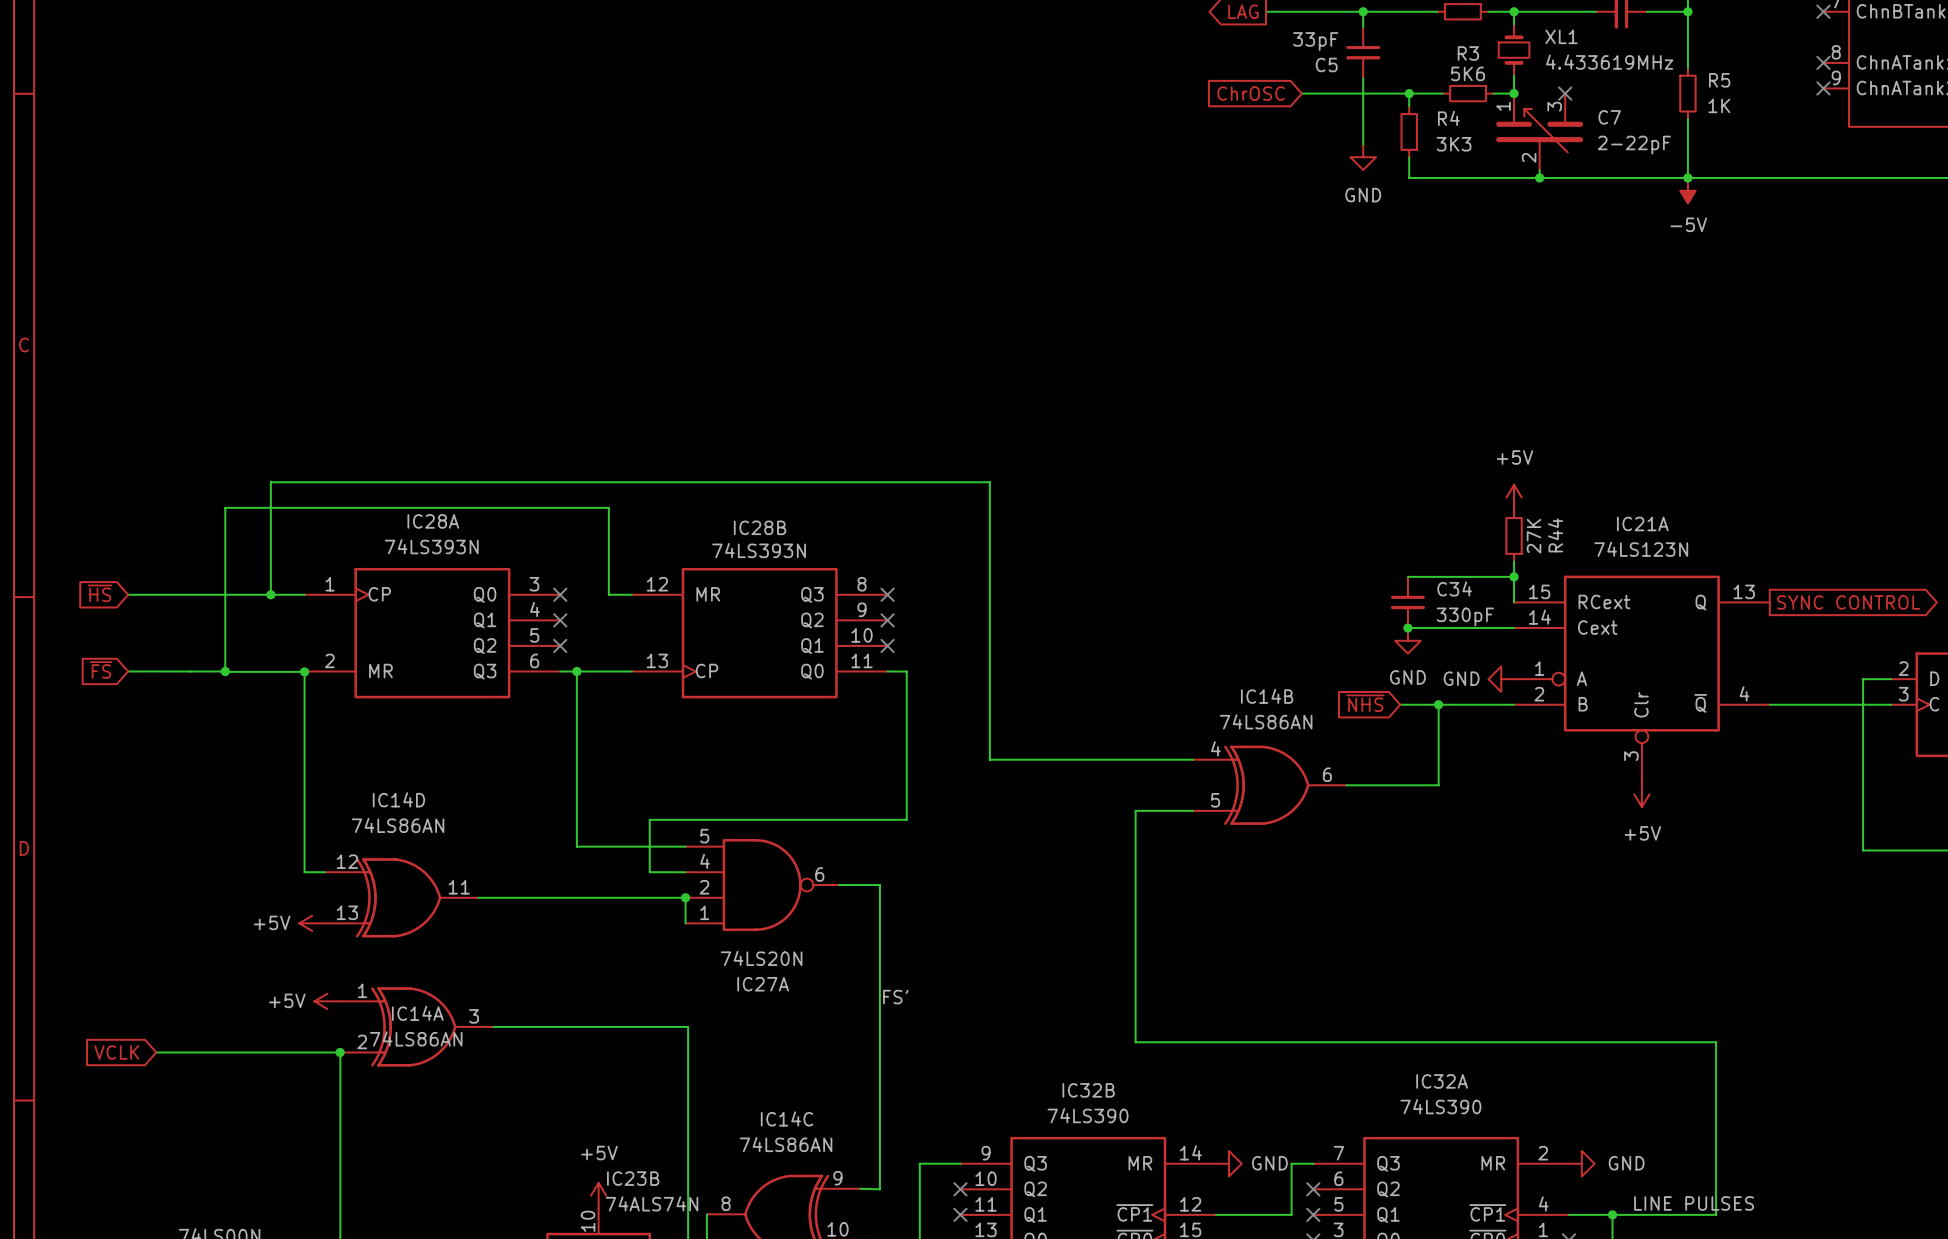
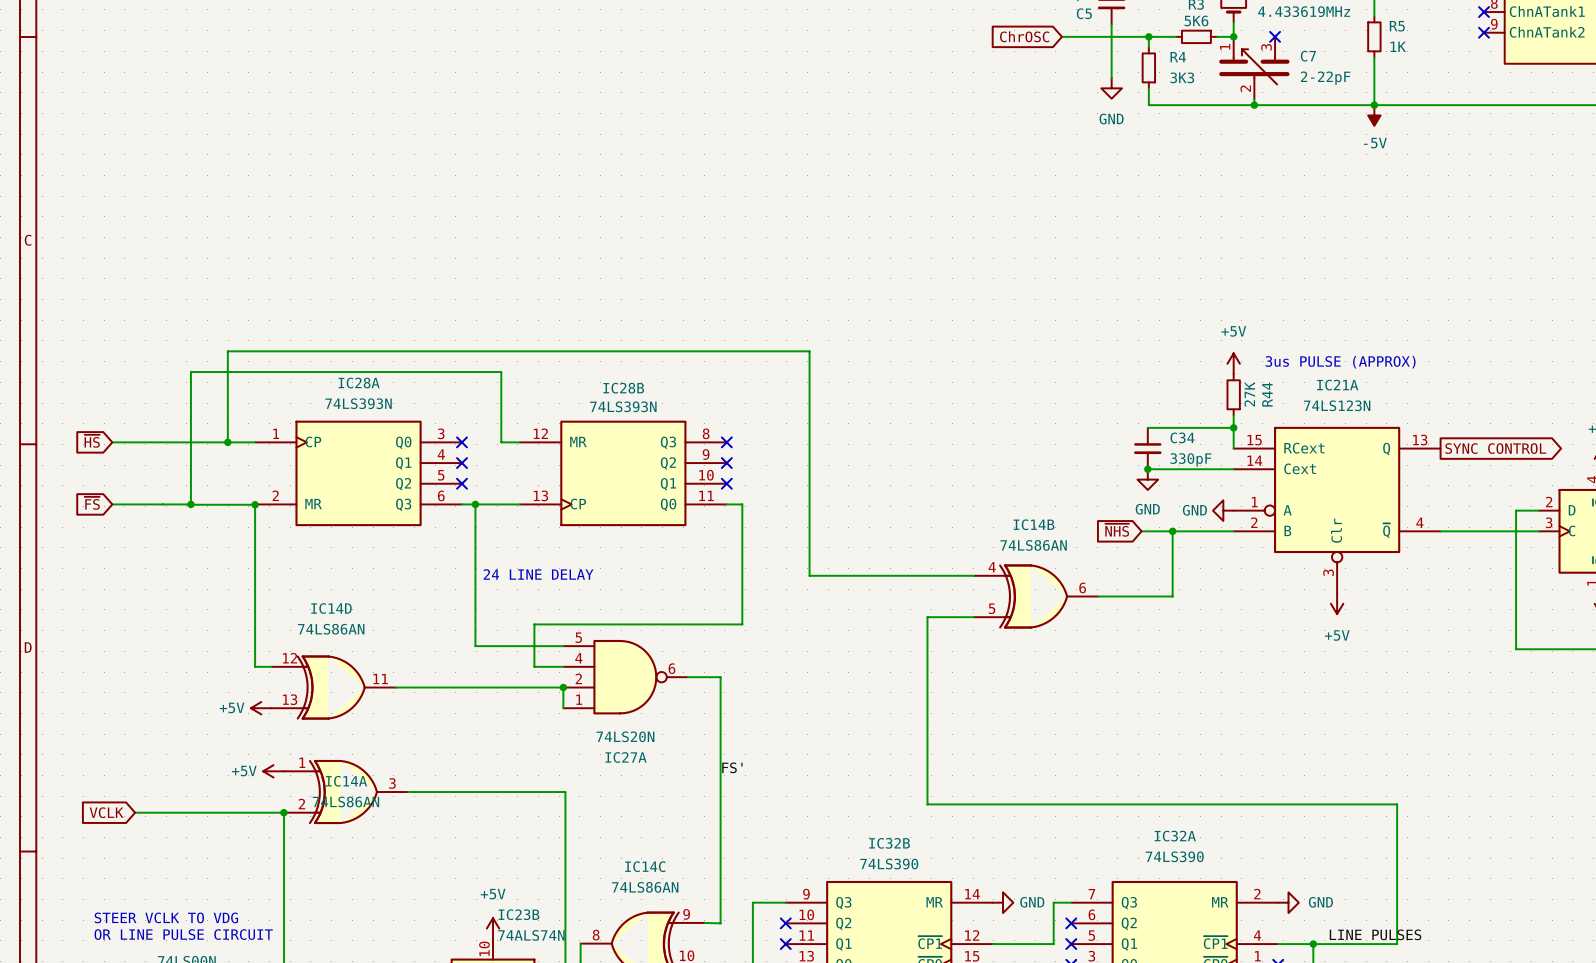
text: none -> 3us PULSE (APPROX) (1340, 362)
text: none -> 24 LINE DELAY (538, 574)
text: none -> STEER VCLK TO VDG (166, 917)
text: none -> OR LINE PULSE CIRCUIT (183, 934)

